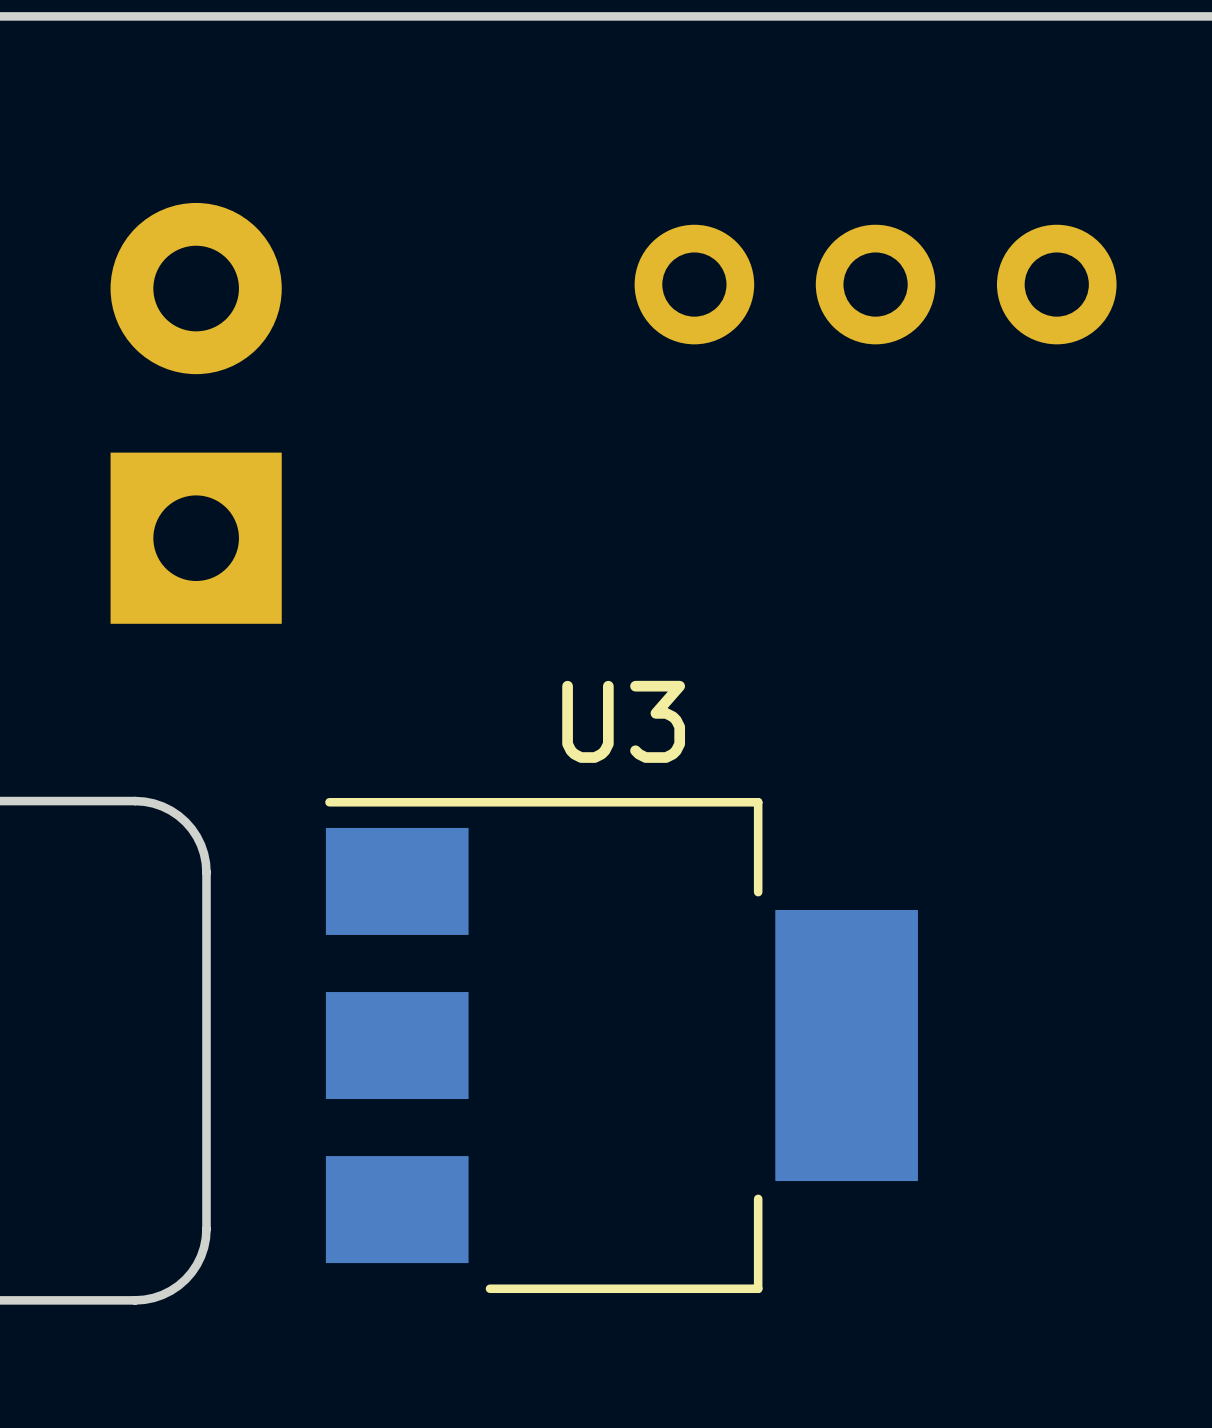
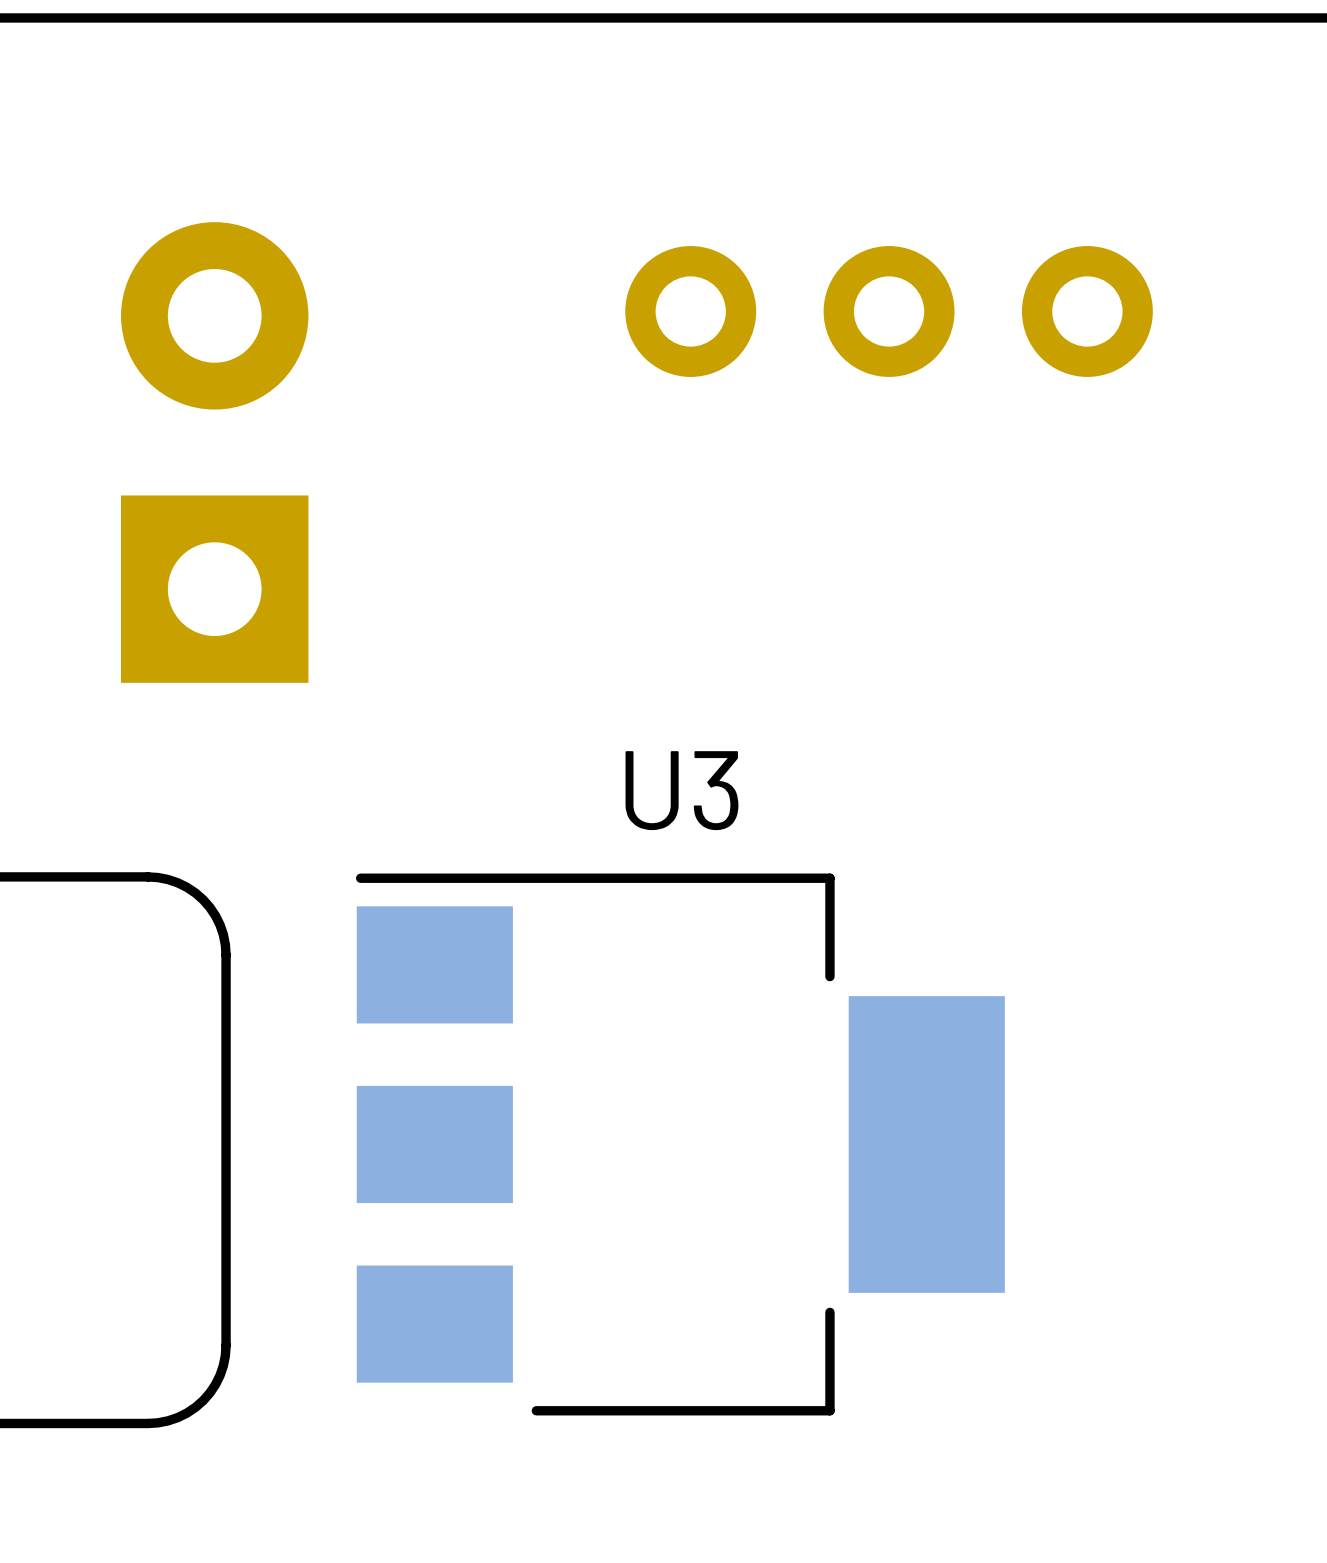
part position: (875, 284) -> (889, 311)

